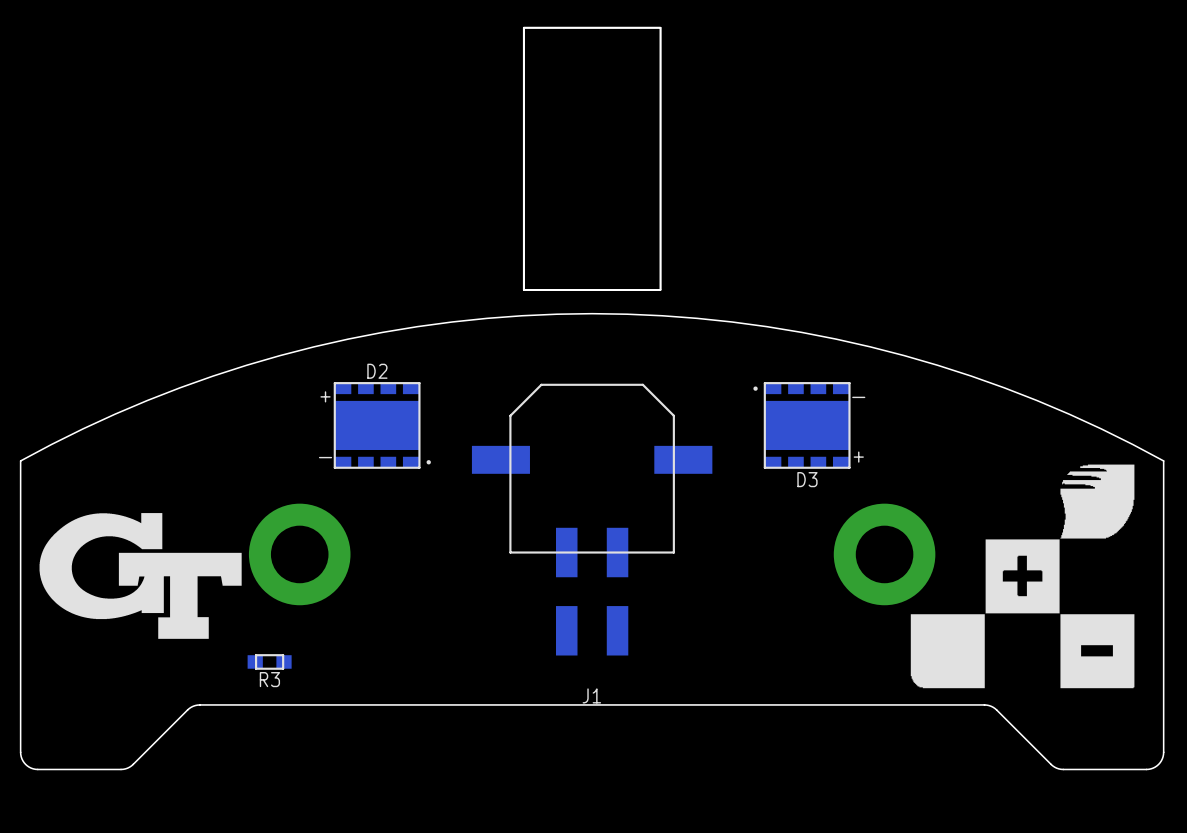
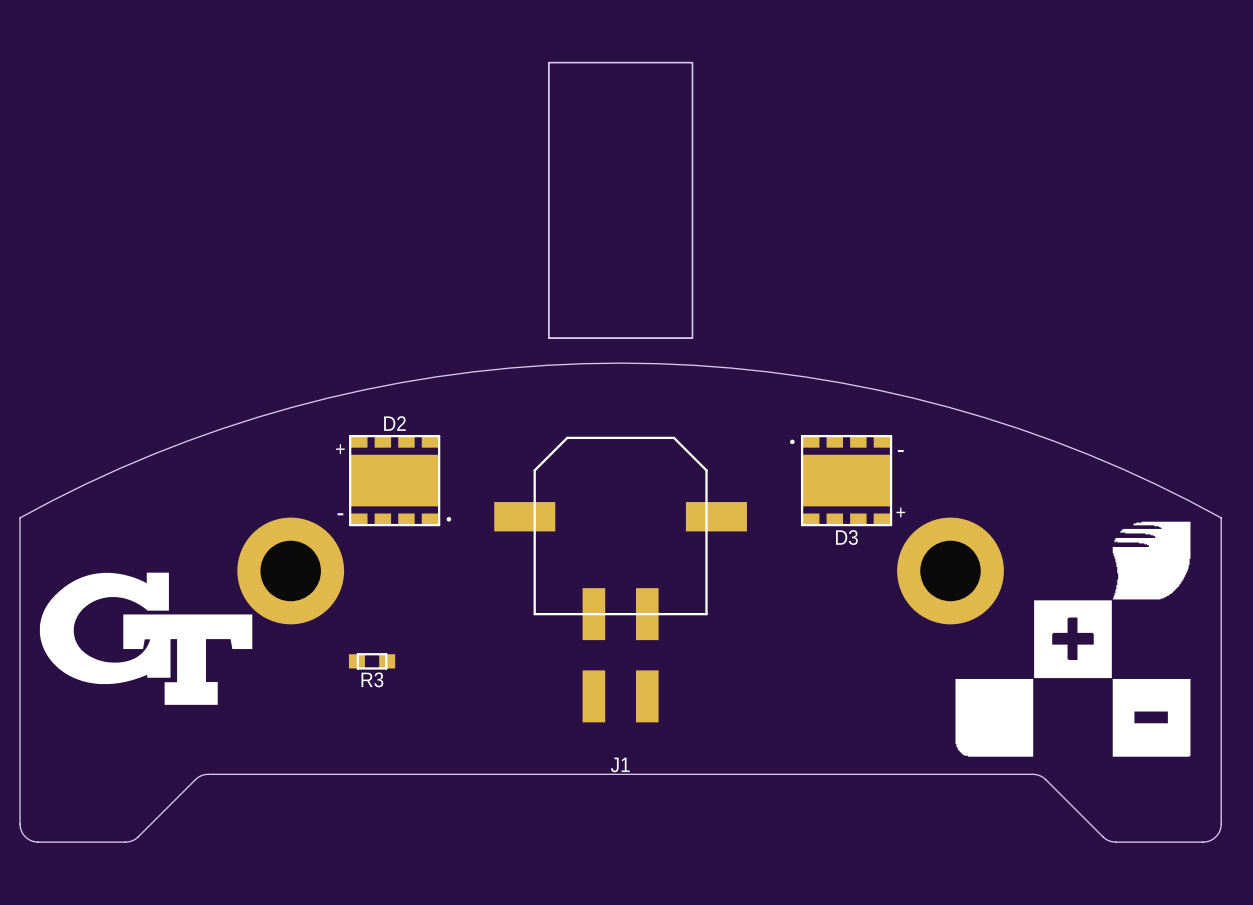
part position: (299, 554) -> (290, 570)
part position: (884, 554) -> (950, 570)
R3 position: (269, 661) -> (372, 661)

